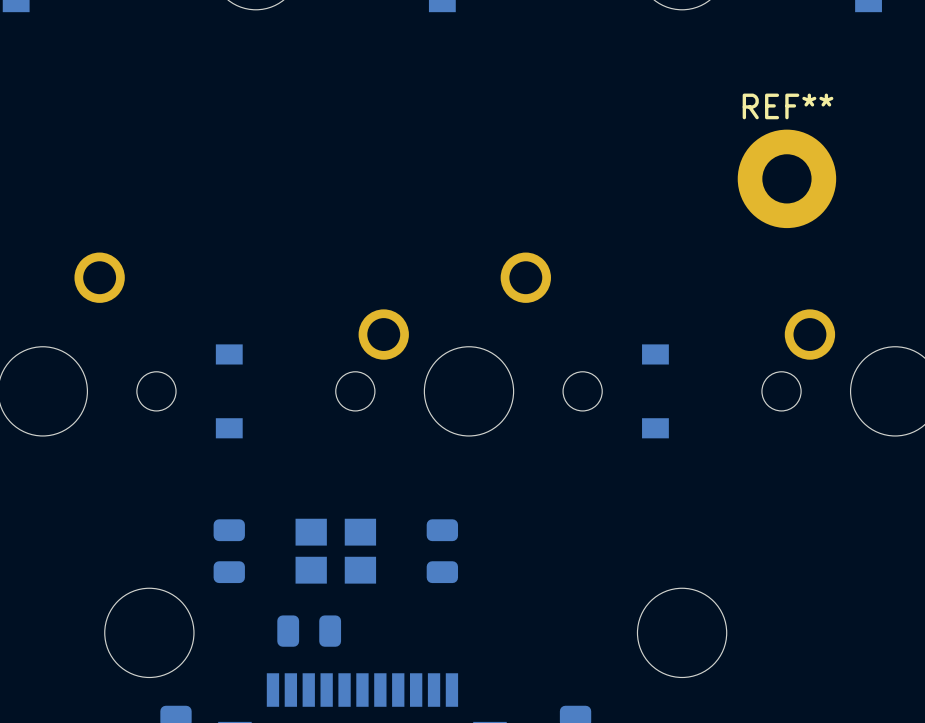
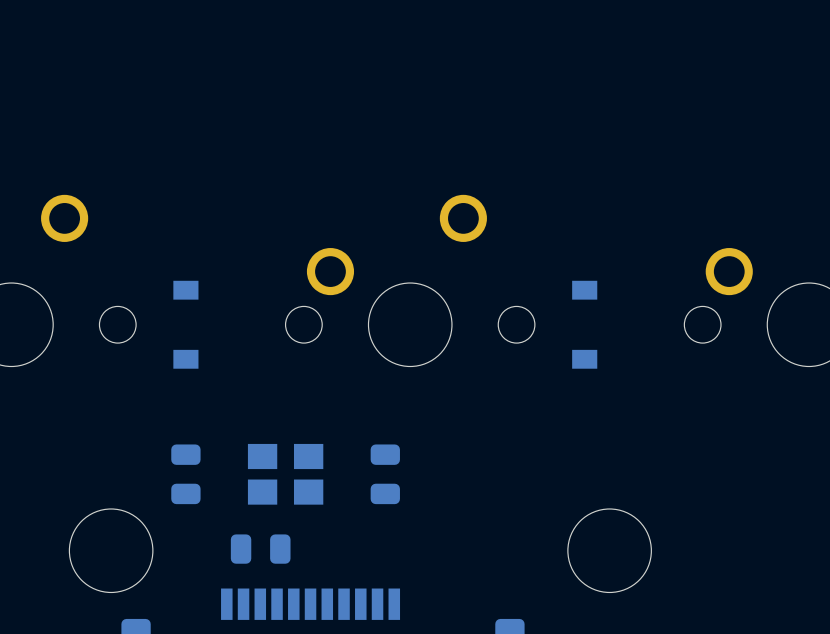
REF**: (786, 178) -> none

